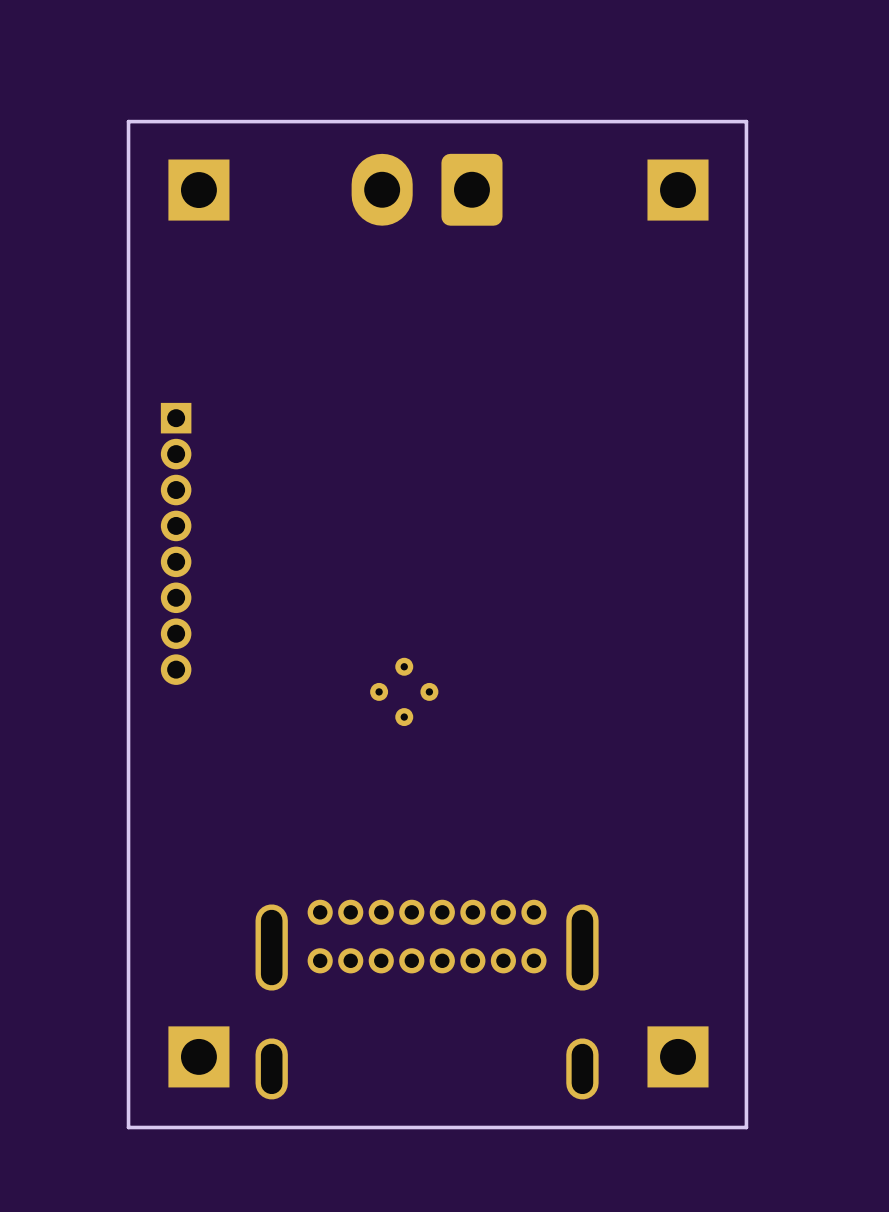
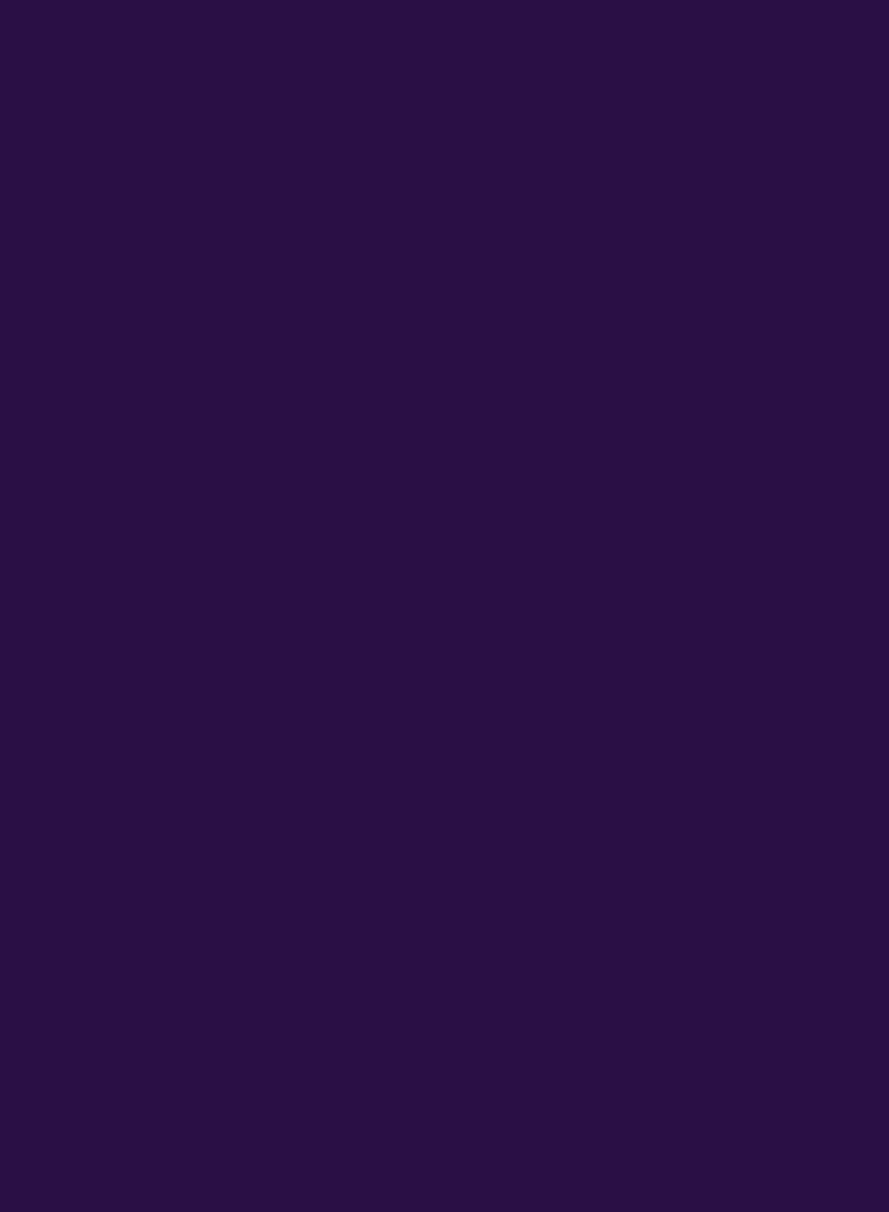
board edge: (746, 121) (128, 121) (128, 1127) (746, 1127) (746, 121) -> none
part: (427, 189) -> none
part: (198, 190) -> none
part: (678, 190) -> none
part: (176, 543) -> none
part: (404, 691) -> none
part: (427, 999) -> none
part: (198, 1056) -> none
part: (678, 1056) -> none

